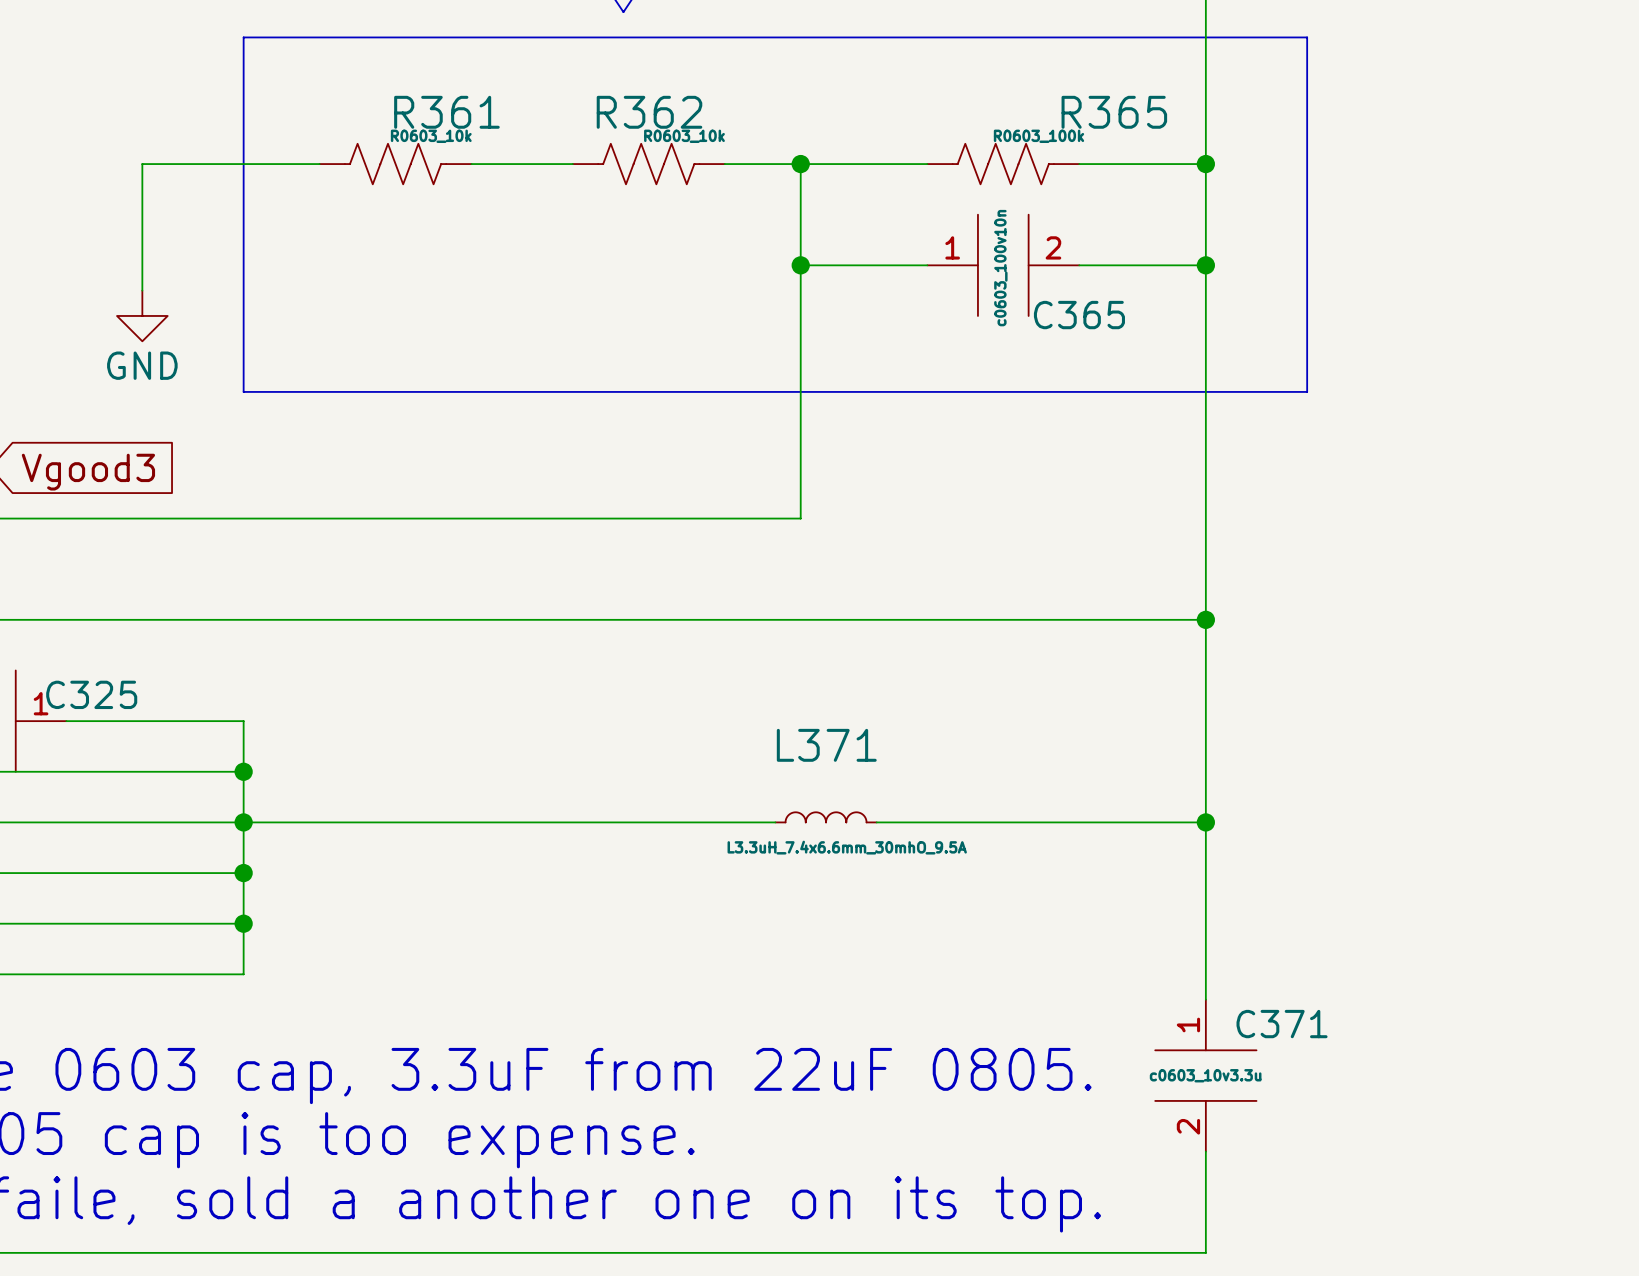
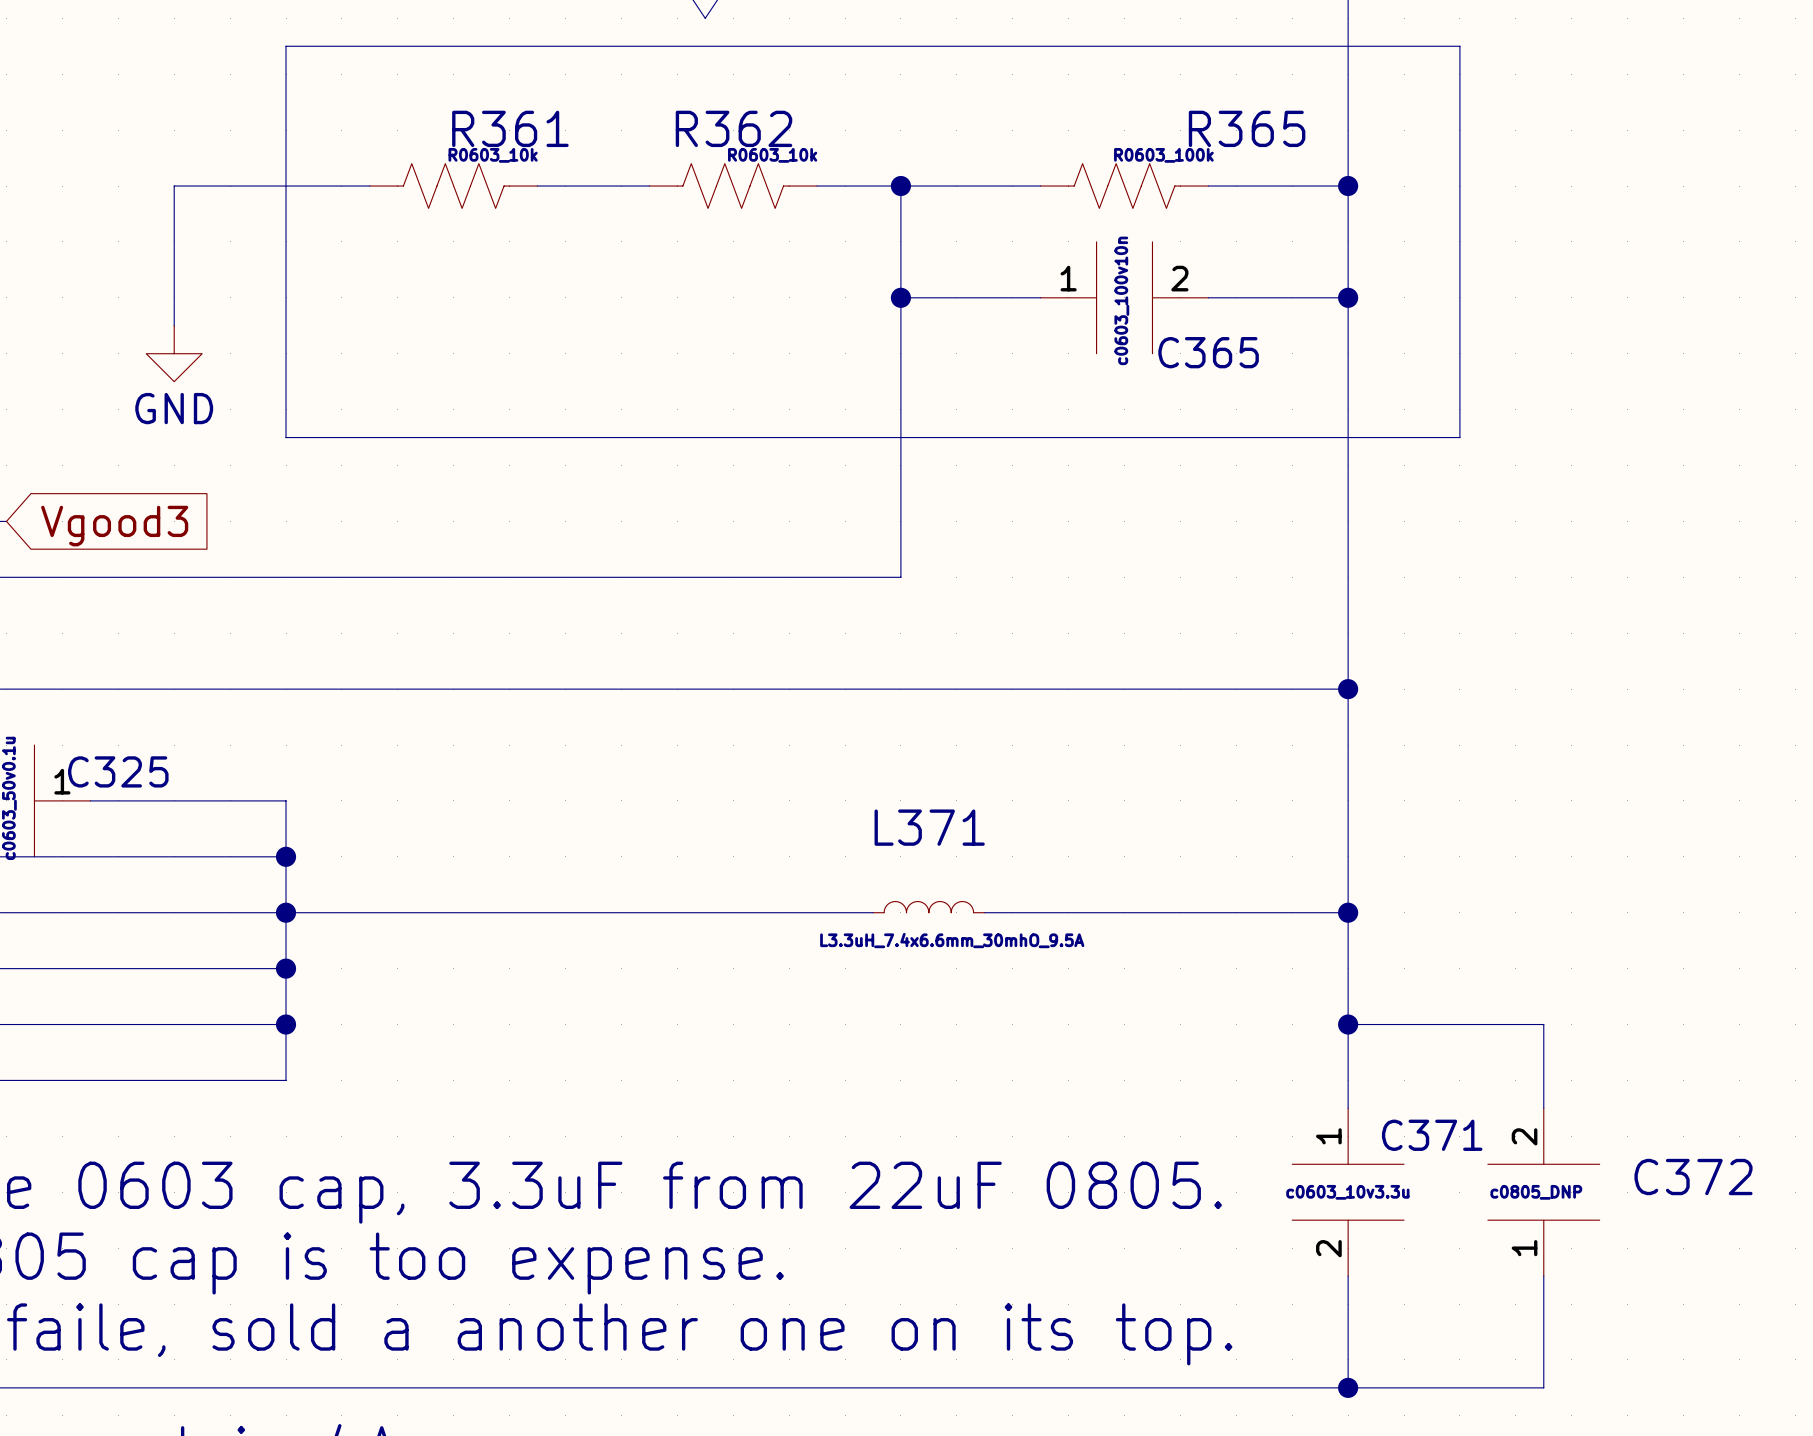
wire: none -> (1348, 1024) (1543, 1024) (1543, 1108)
junction: none -> (1348, 1024)
C372: none -> c0805_DNP (1543, 1192)
wire: none -> (1543, 1276) (1543, 1387) (1348, 1387)
junction: none -> (1348, 1387)

